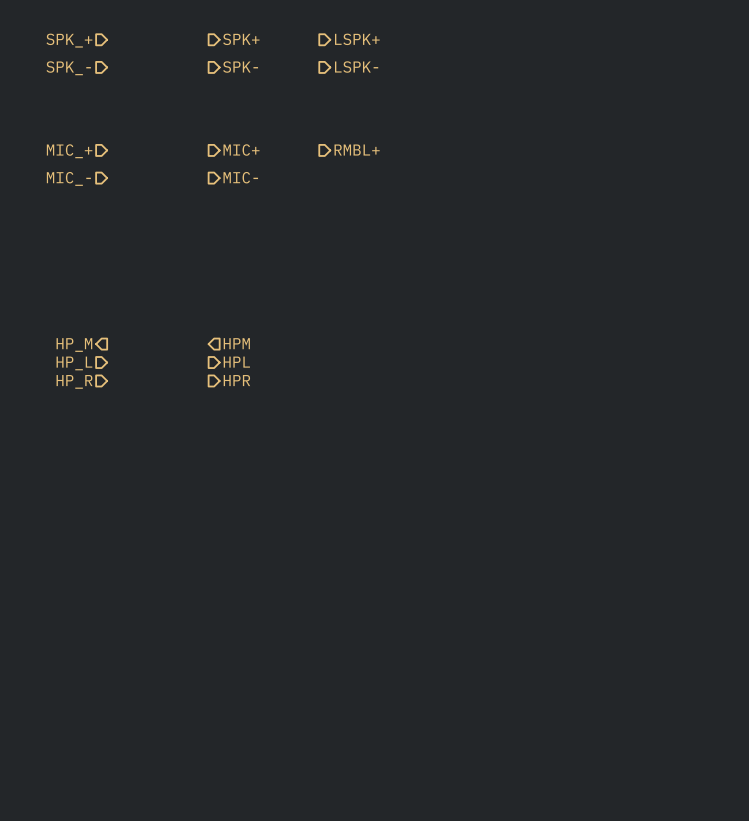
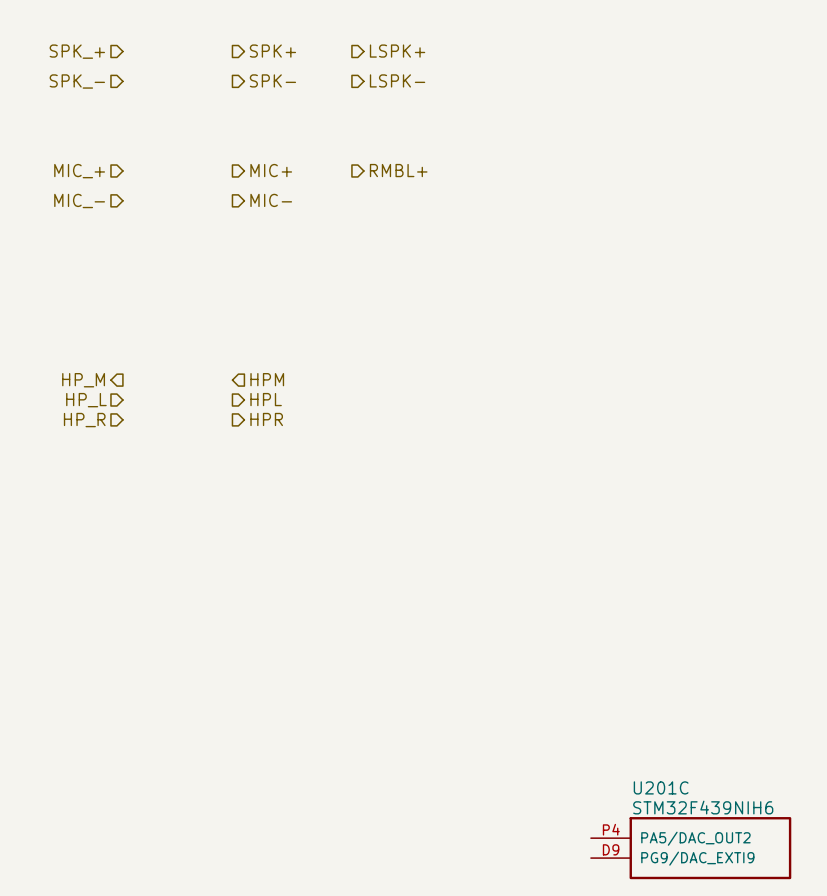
U201C: none -> STM32F439NIH6 (691, 848)

